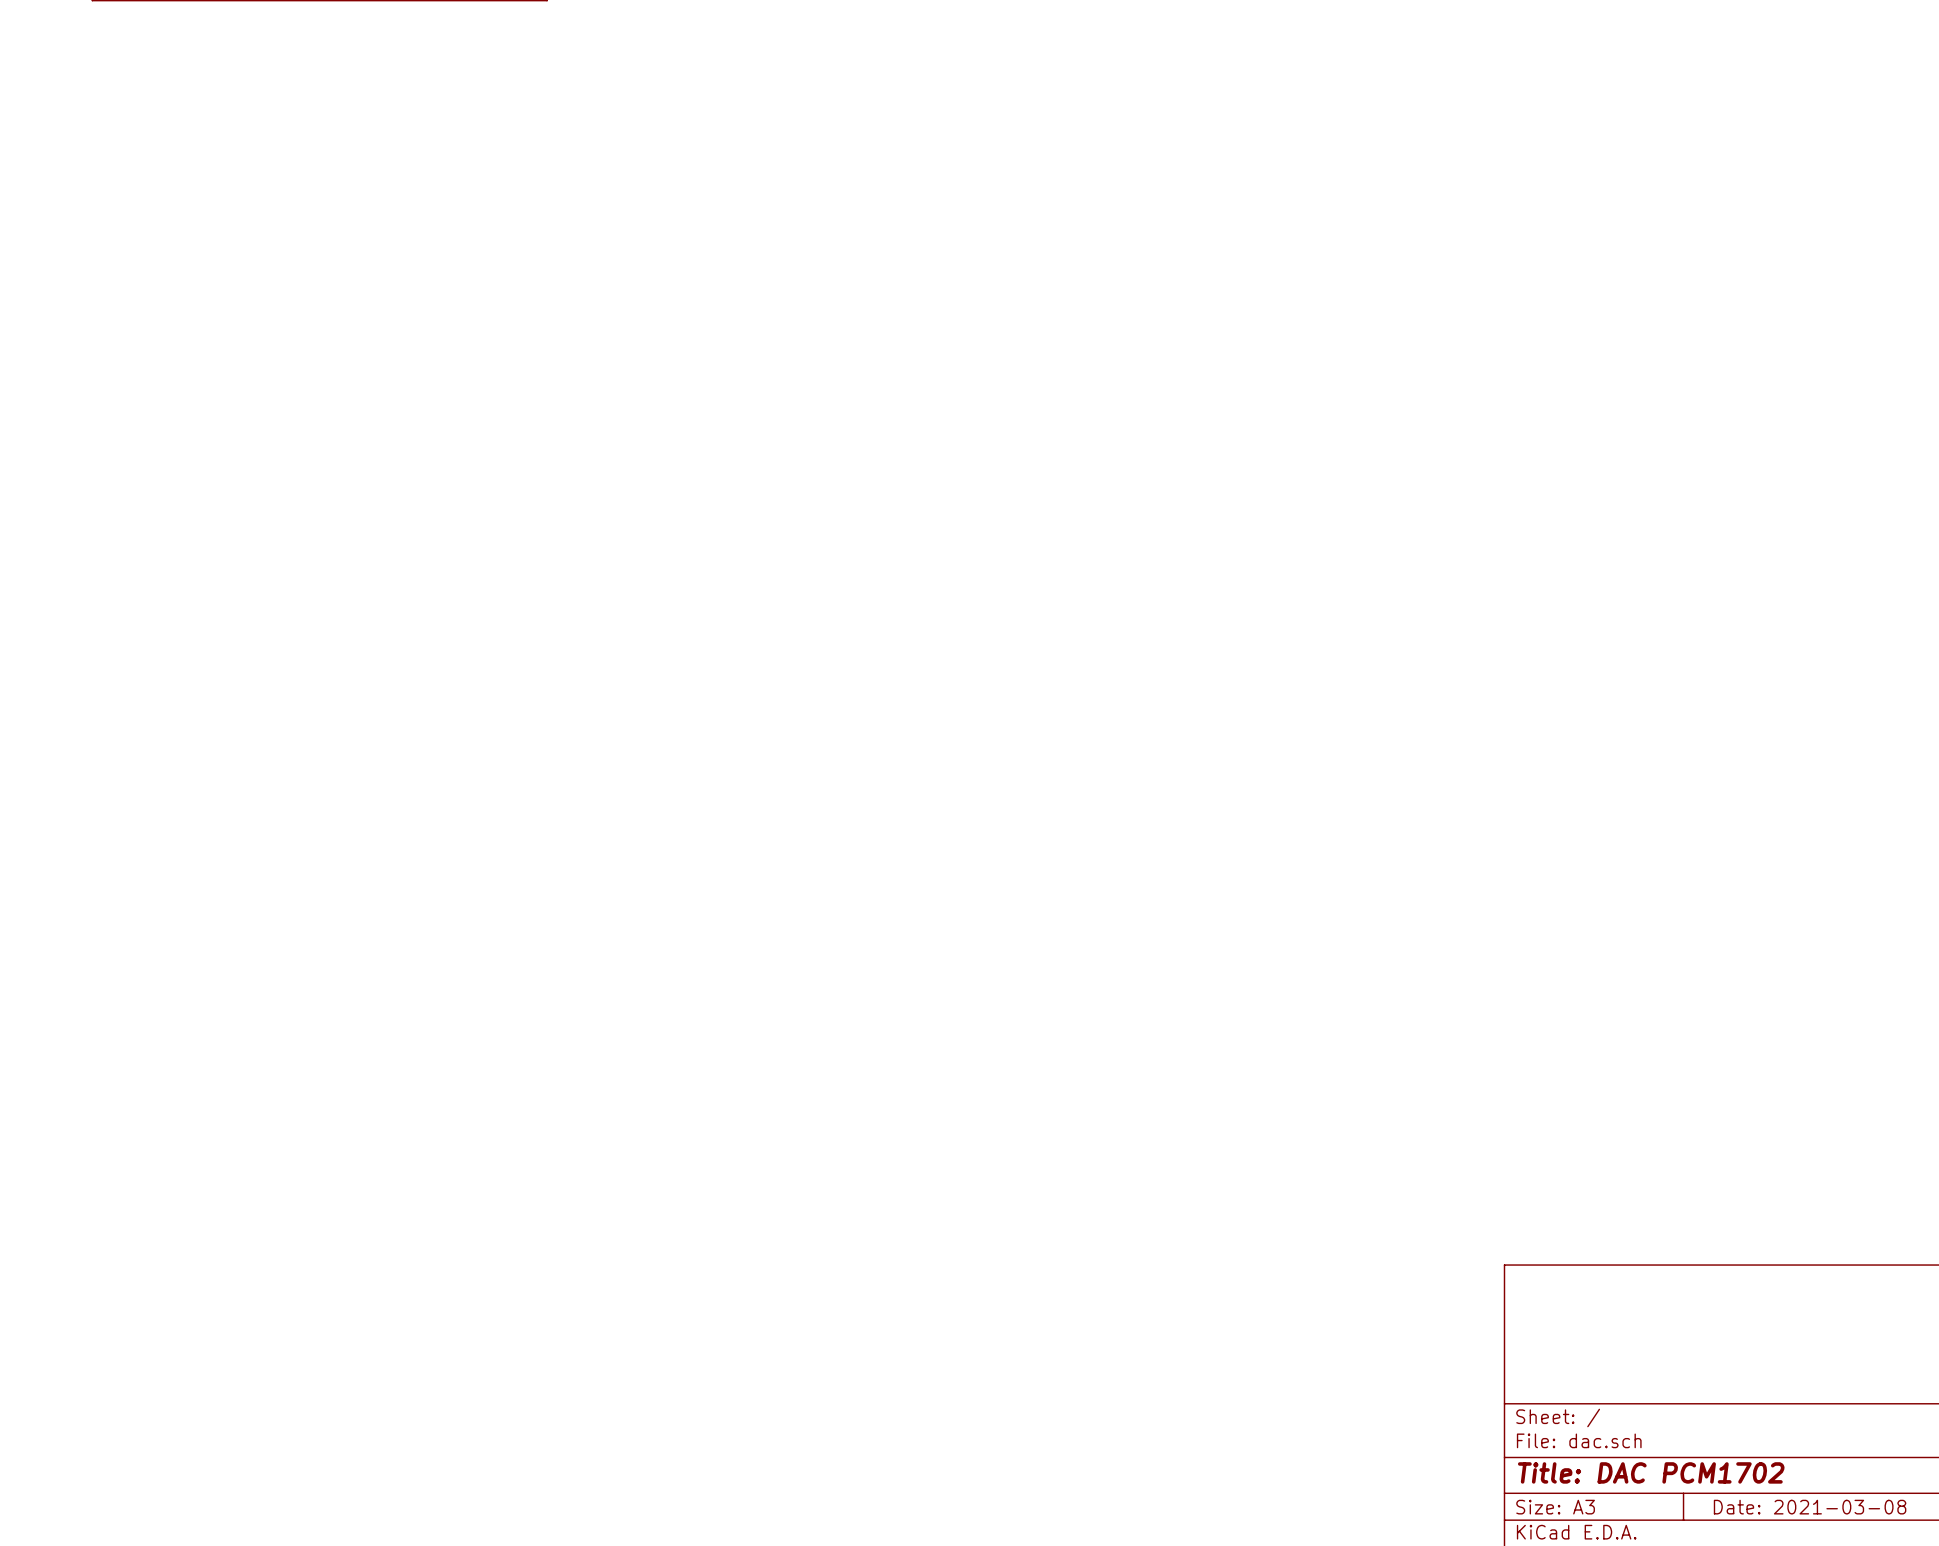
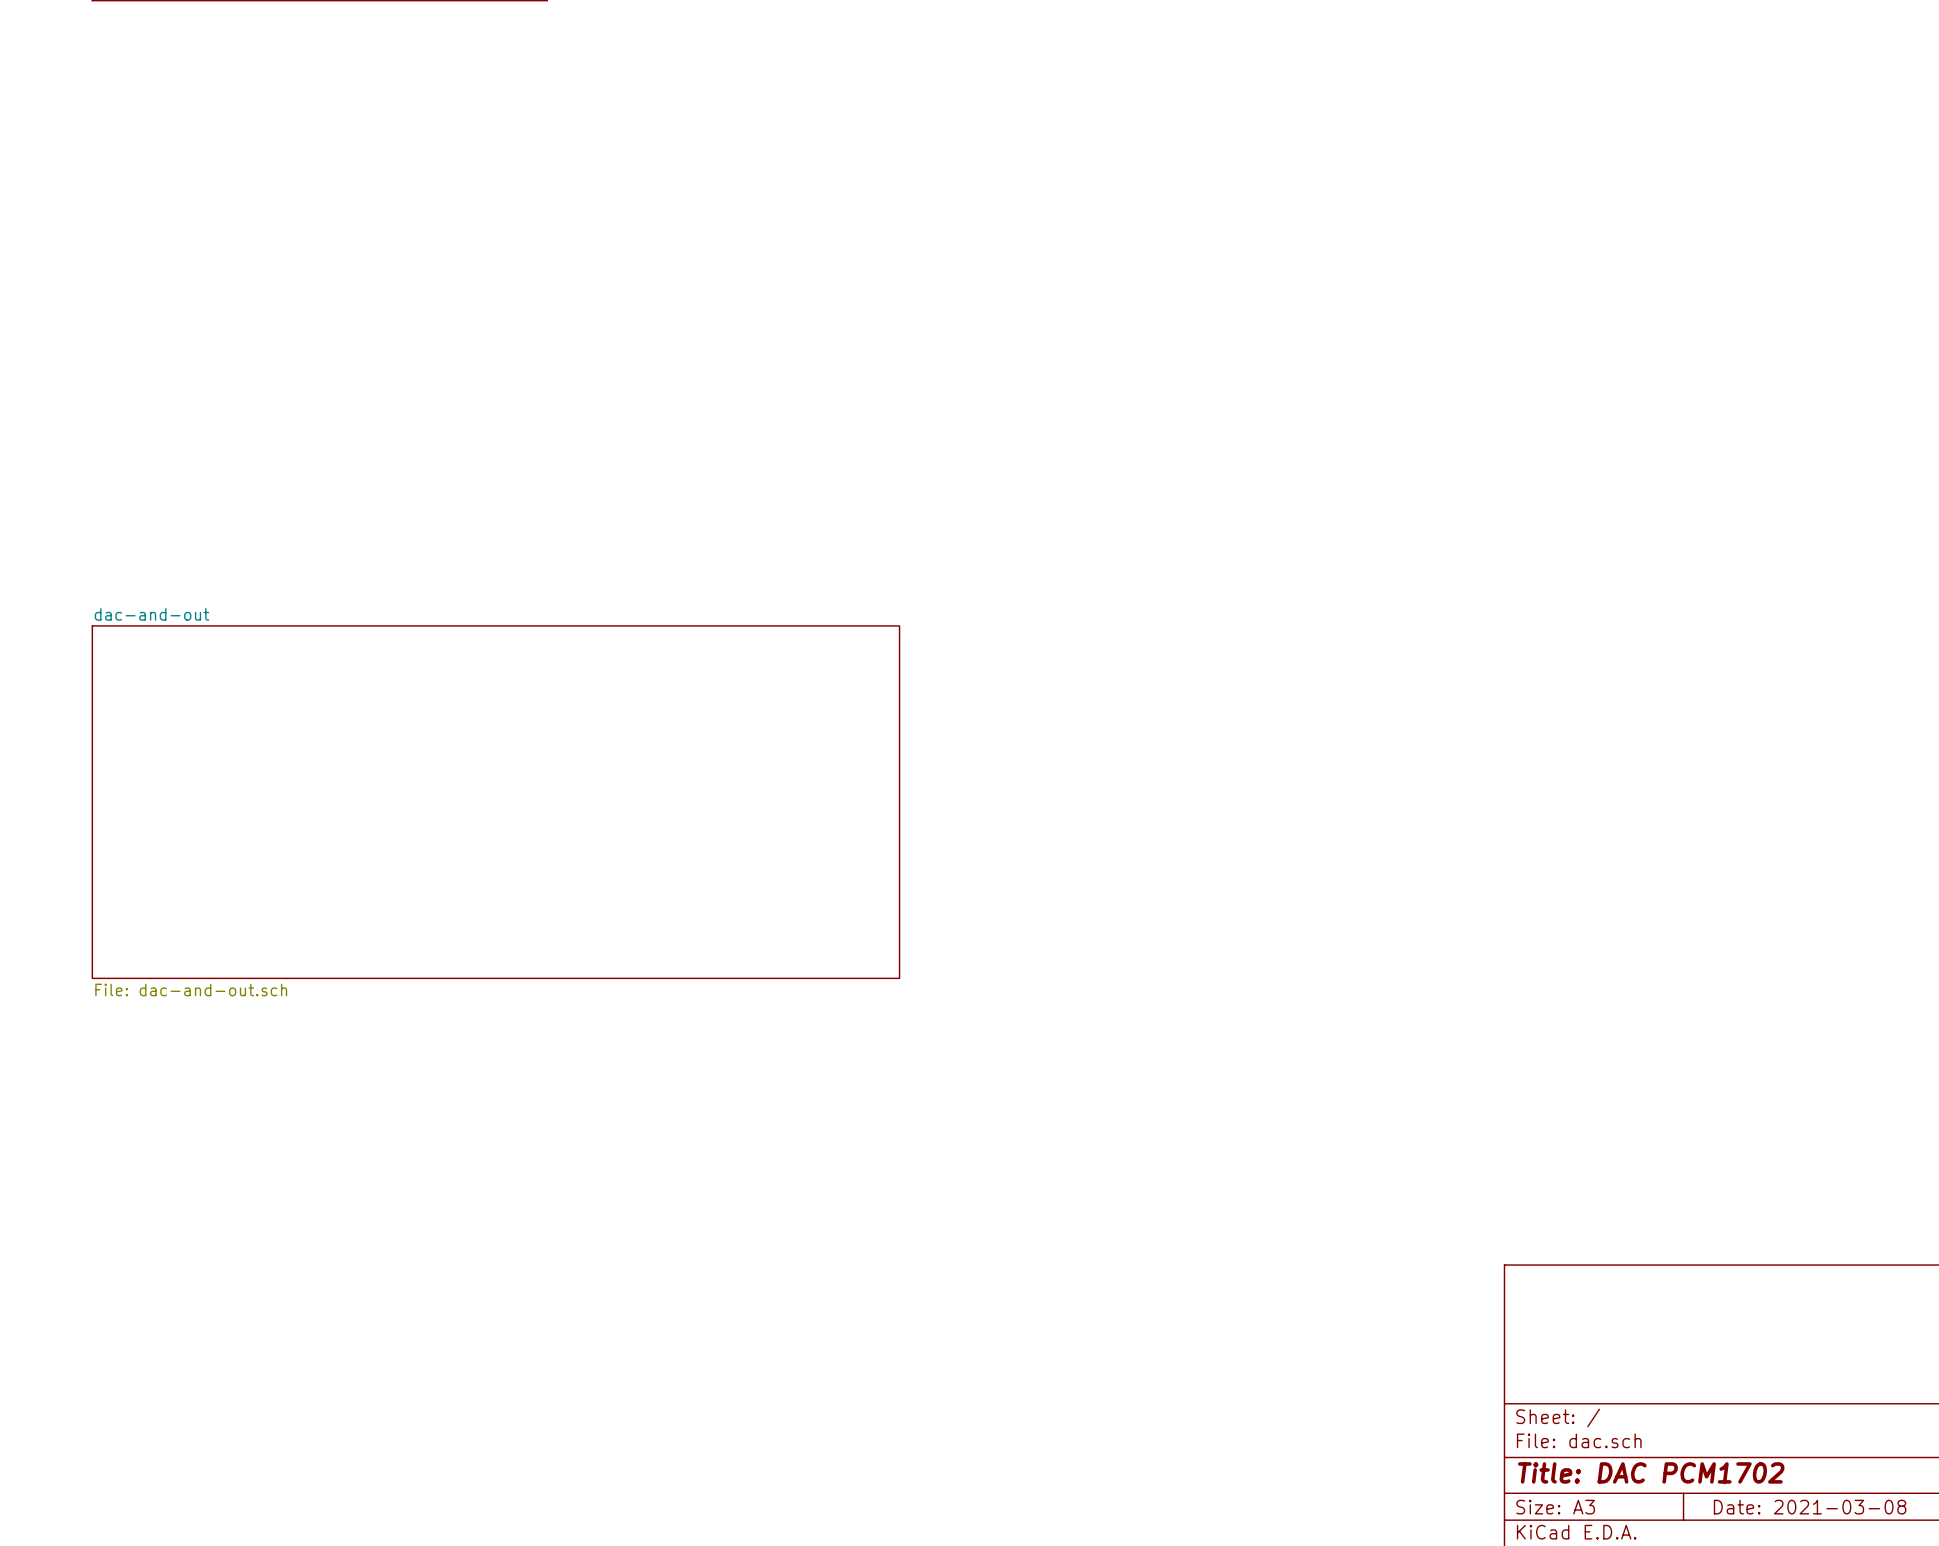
sheet dac-and-out: none -> File: dac-and-out.sch (495, 802)

